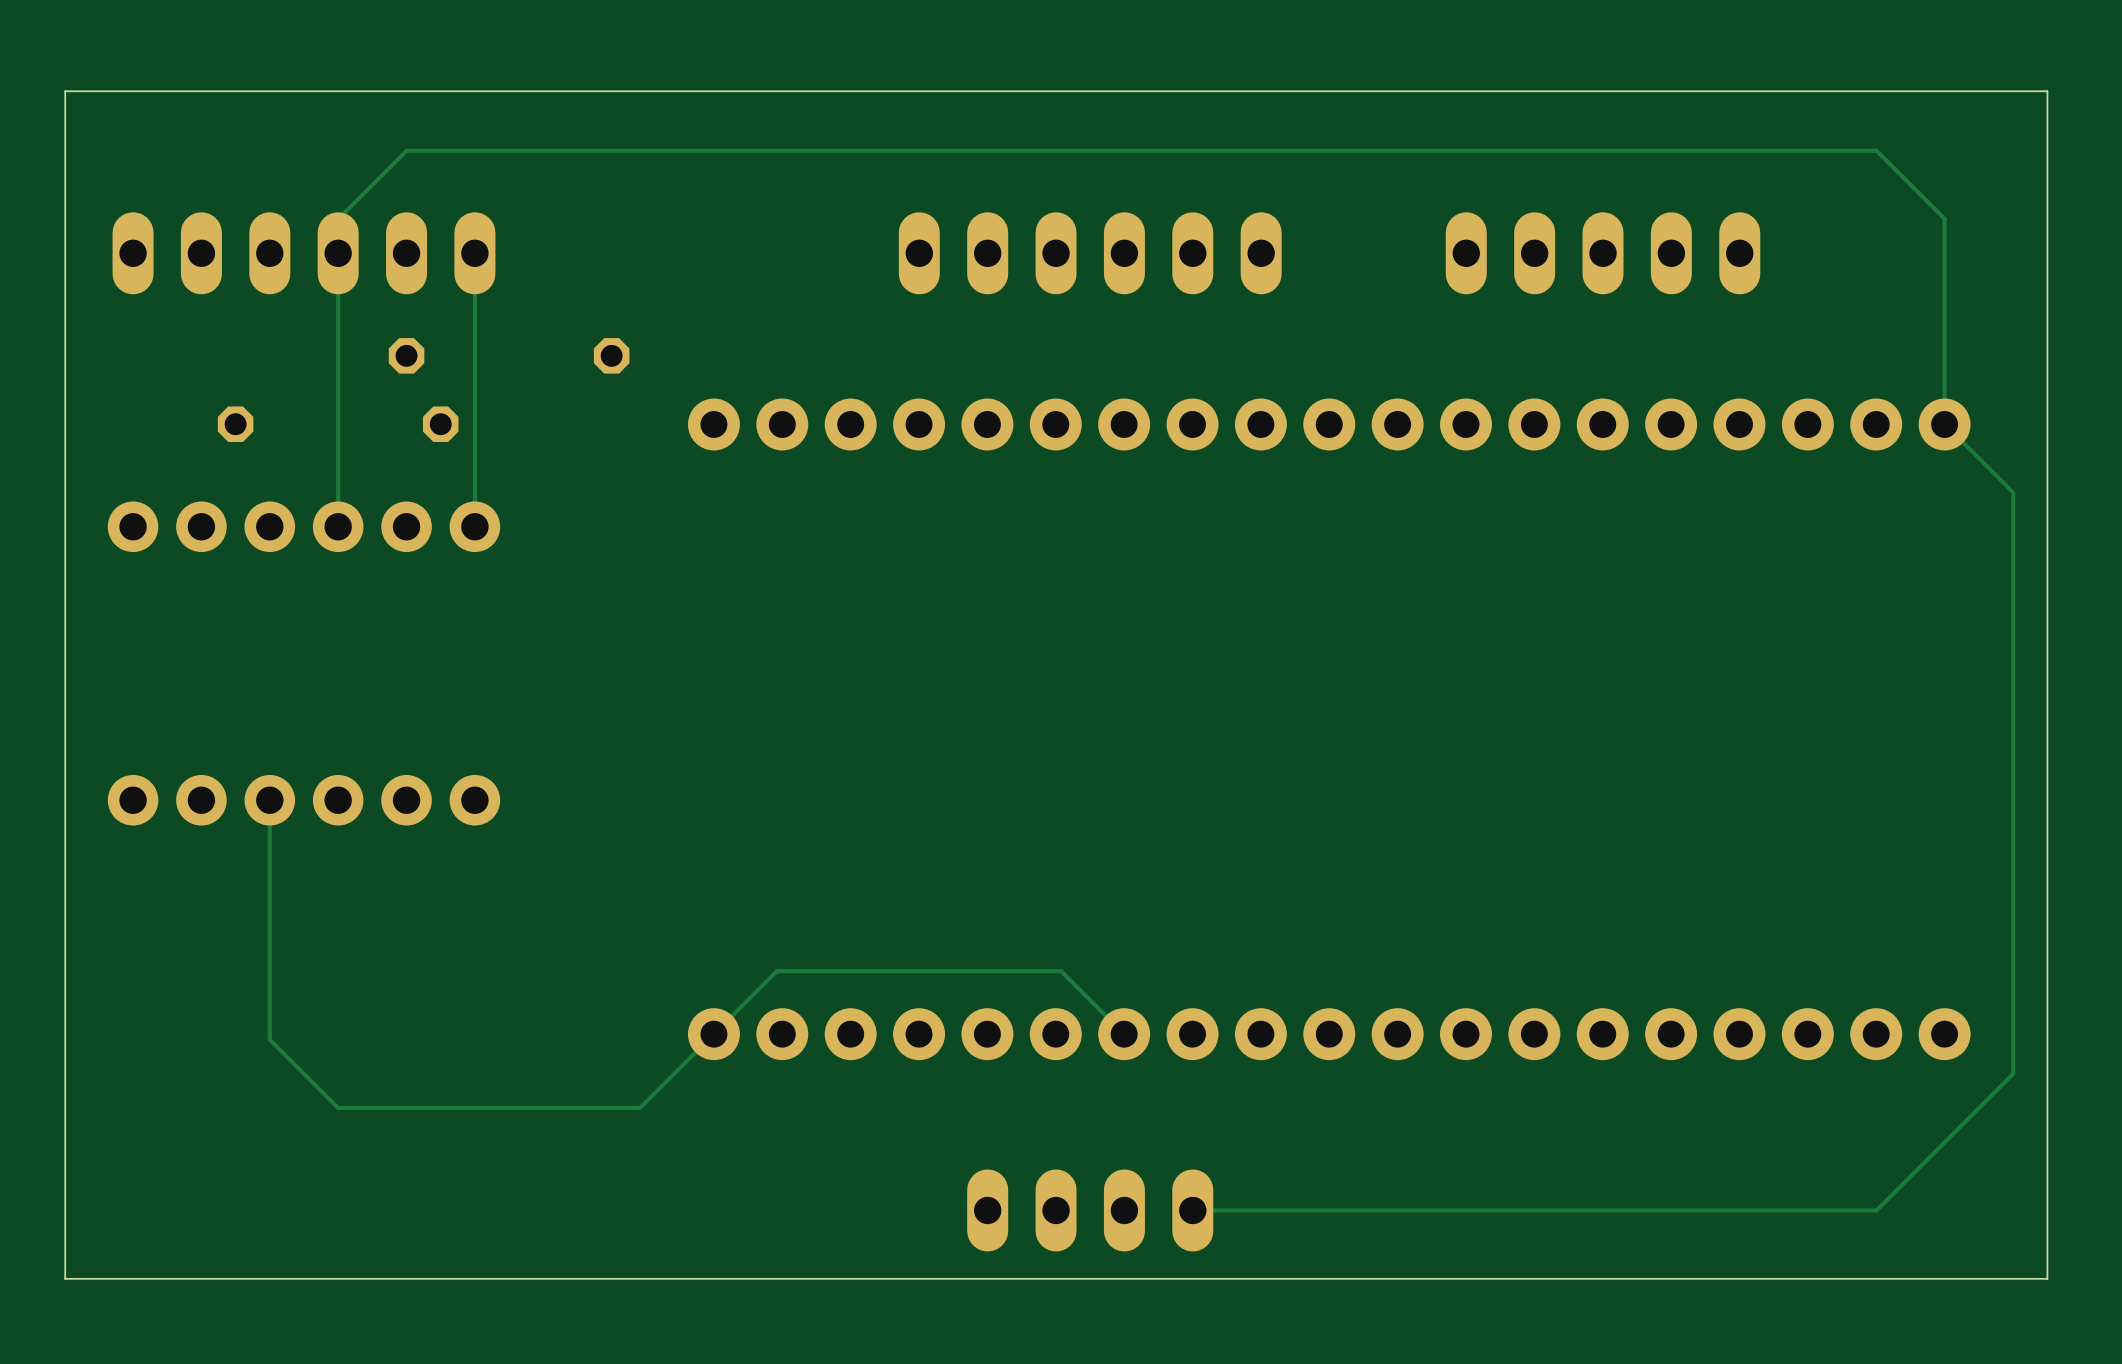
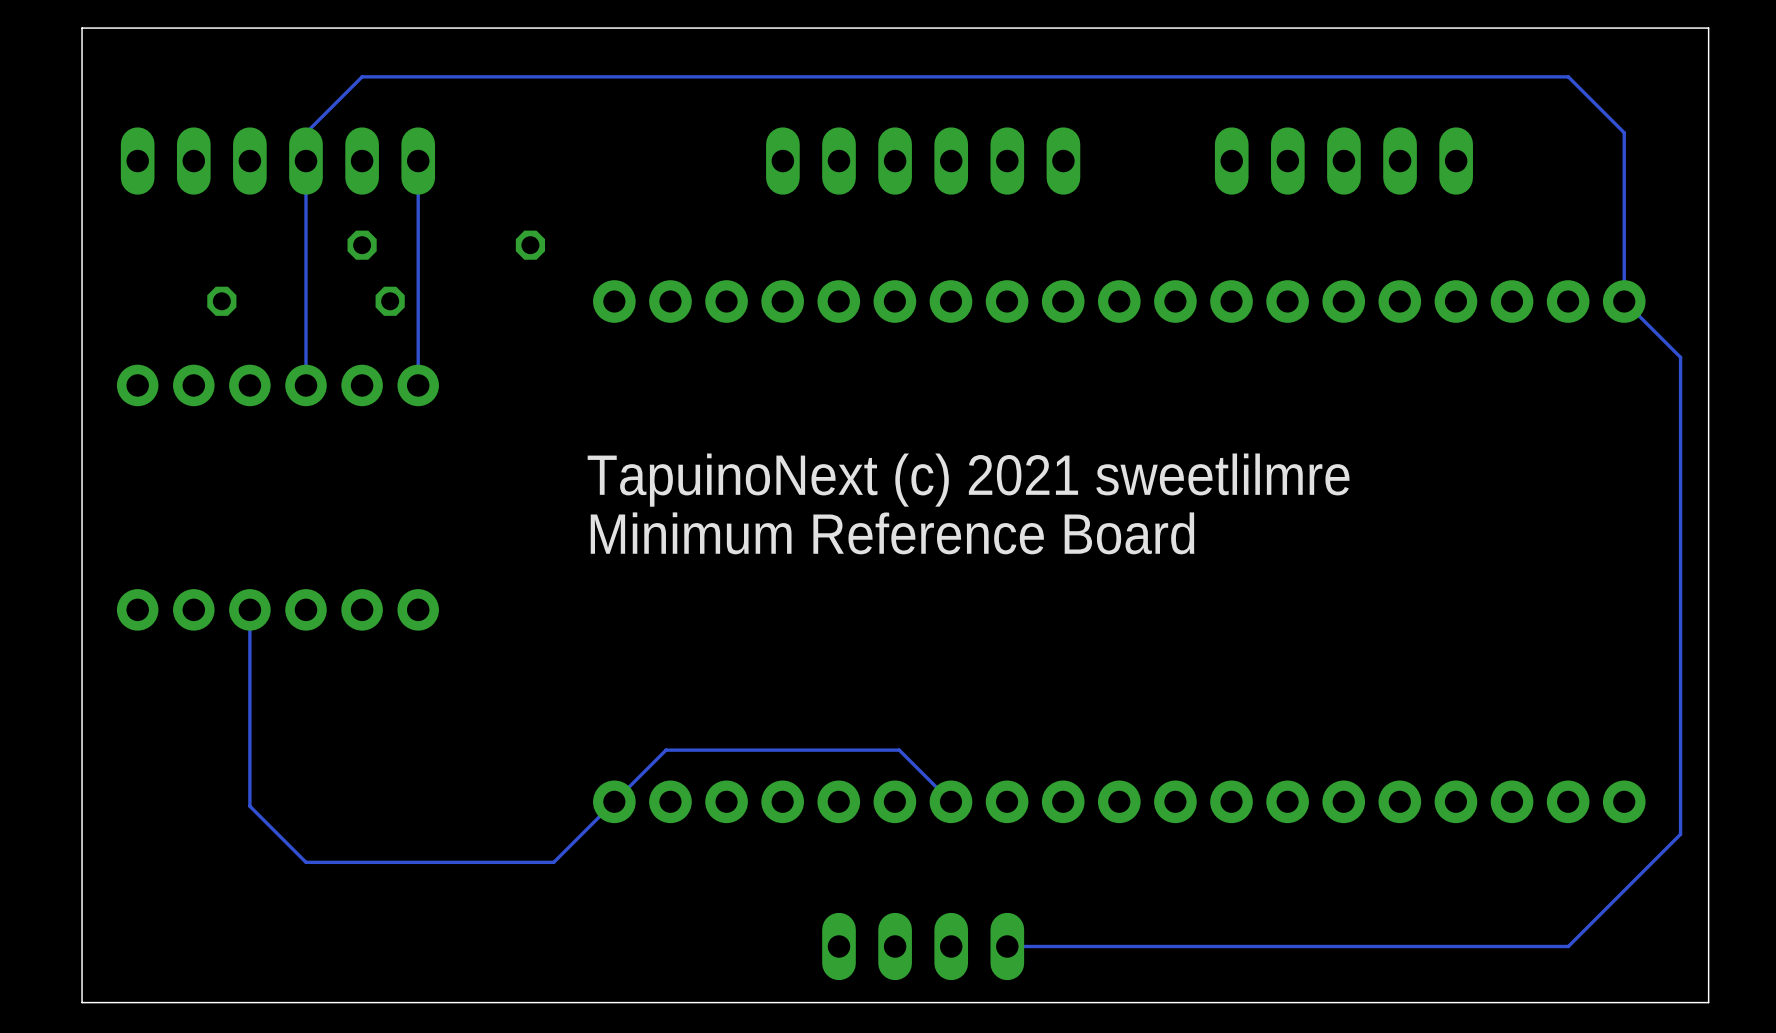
text: none -> TapuinoNext (c) 2021 sweetlilmre (968, 480)
text: none -> Minimum Reference Board (892, 533)

